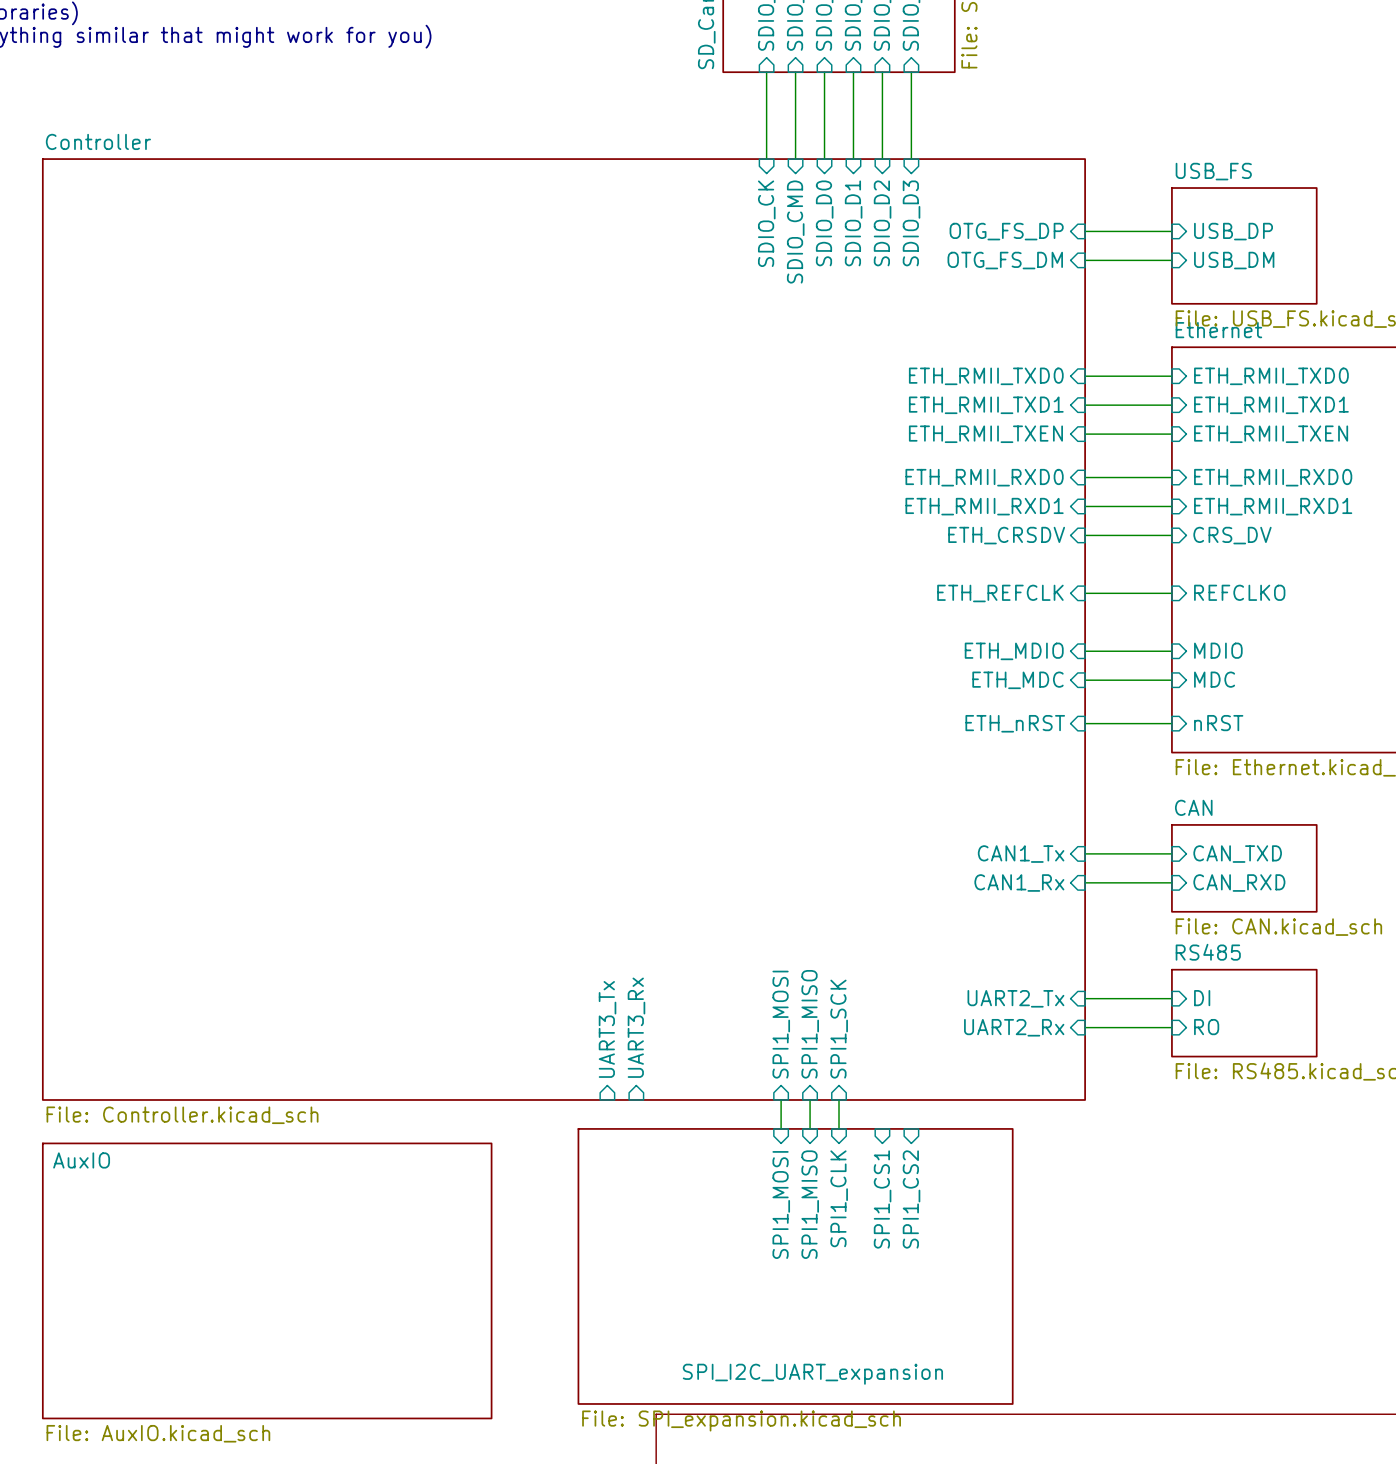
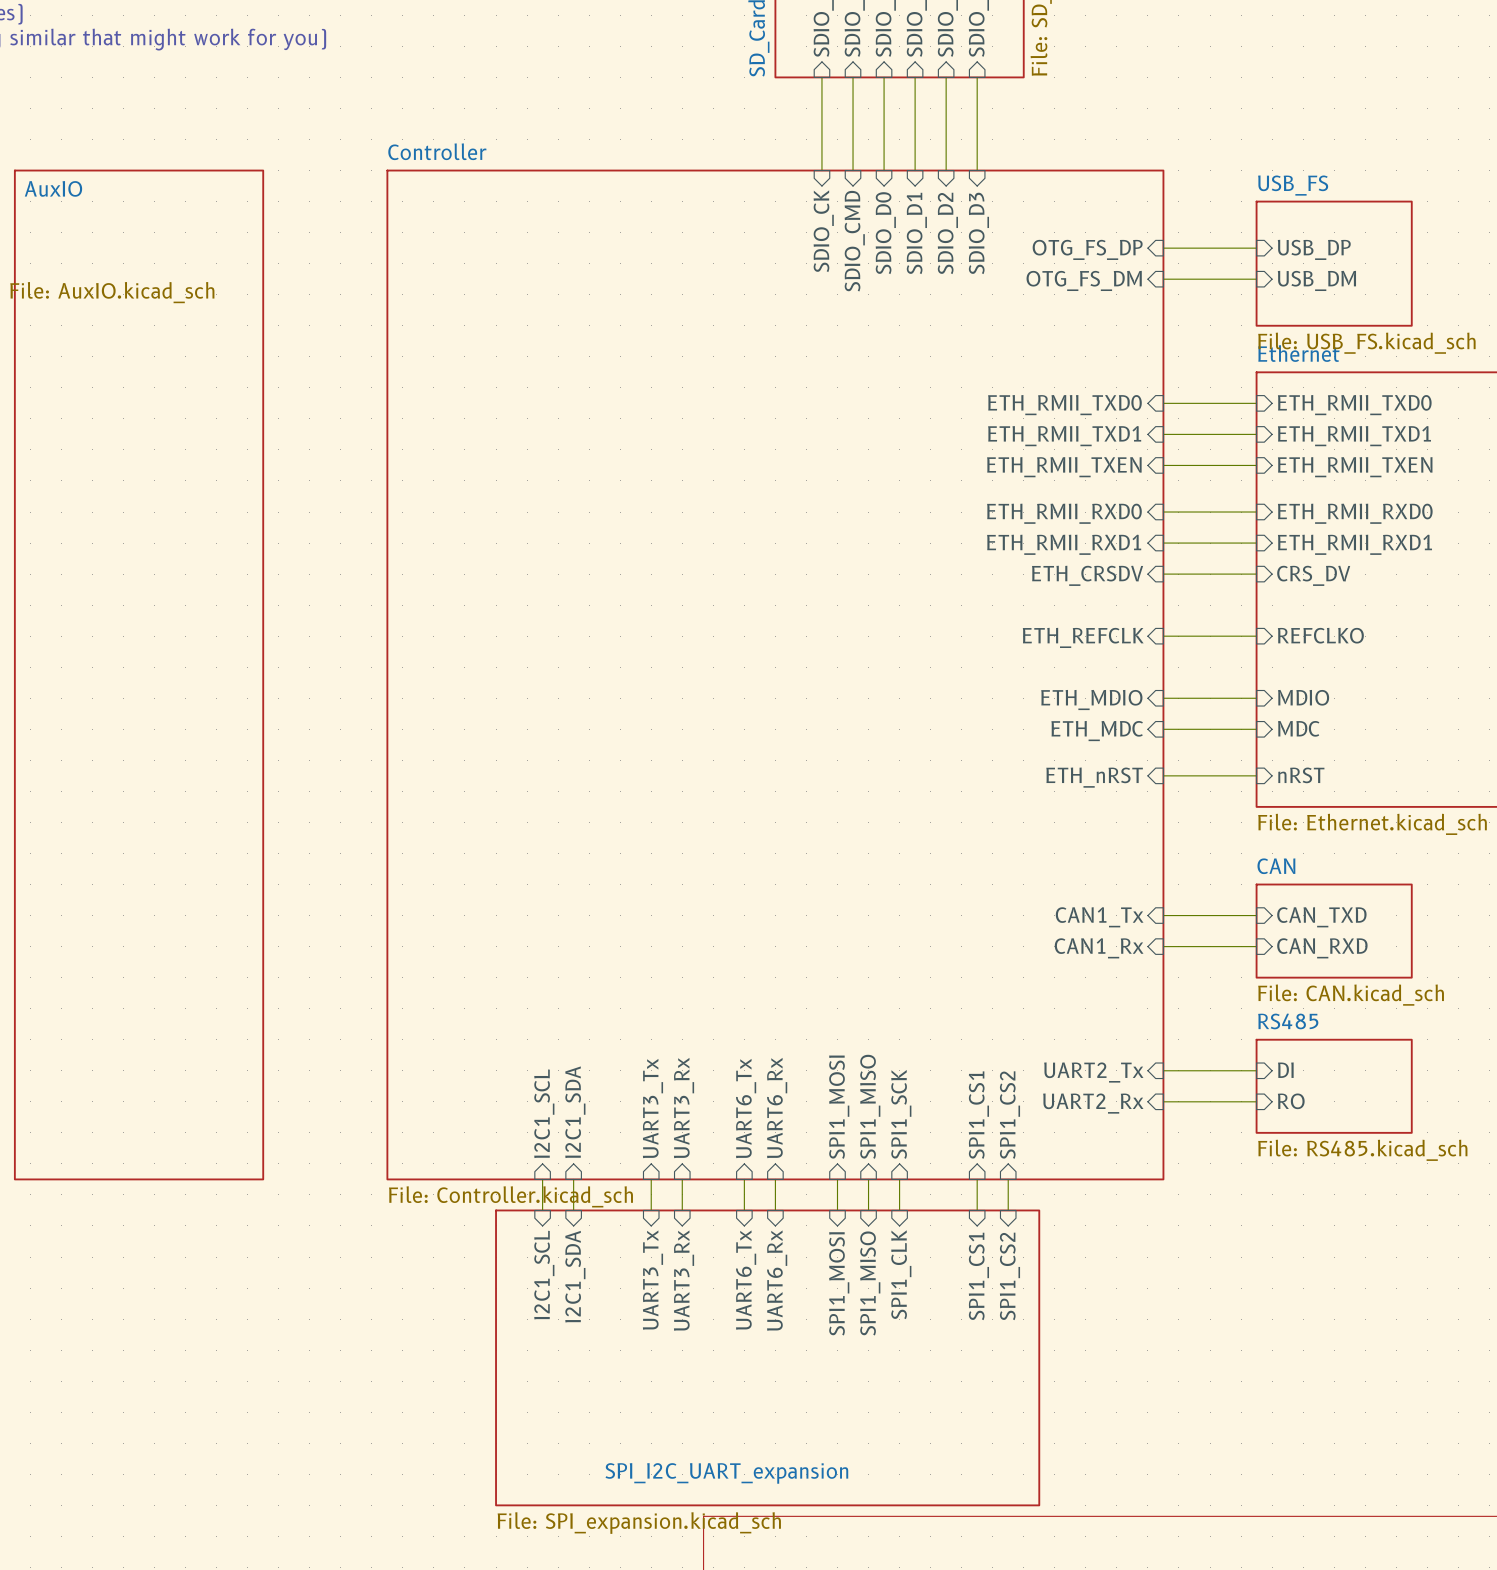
sheet AuxIO: none -> File: AuxIO.kicad_sch (139, 674)
sheet Controller: File: Controller.kicad_sch (563, 629) -> none
sheet Controller: none -> File: Controller.kicad_sch (775, 674)
sheet pin: none -> UART6_Rx (777, 1108)
sheet pin: none -> I2C1_SCL (544, 1113)
sheet pin: none -> I2C1_SDA (575, 1112)
sheet pin: none -> UART6_Tx (746, 1108)
sheet pin: none -> SPI1_CS2 (1009, 1115)
wire: none -> (542, 1179) (542, 1210)
wire: none -> (573, 1179) (573, 1210)
wire: none -> (651, 1179) (651, 1210)
wire: none -> (682, 1179) (682, 1210)
wire: none -> (744, 1179) (744, 1210)
wire: none -> (775, 1179) (775, 1210)
wire: none -> (977, 1179) (977, 1210)
wire: none -> (1008, 1179) (1008, 1210)
sheet SPI_I2C_UART_expansion shape: [577, 1128, 1014, 1405] -> [495, 1209, 1041, 1507]
sheet pin: none -> I2C1_SCL (544, 1275)
sheet pin: none -> I2C1_SDA (575, 1276)
sheet pin: none -> UART3_Tx (652, 1280)
sheet pin: none -> UART6_Tx (746, 1280)
sheet pin: none -> UART3_Rx (684, 1280)
sheet pin: none -> UART6_Rx (777, 1280)
sheet pin rotation: 0° (882, 1199) -> 180° (978, 1115)
sheet pin position: SPI1_CS1 (882, 1199) -> SPI1_CS1 (978, 1115)
sheet pin: SPI1_CS2 (911, 1199) -> SPI1_CS1 (978, 1276)
sheet pin: none -> SPI1_CS2 (1009, 1276)
sheet AuxIO: File: AuxIO.kicad_sch (267, 1280) -> none
sheet SPI_I2C_UART_expansion name position: SPI_I2C_UART_expansion (812, 1374) -> SPI_I2C_UART_expansion (726, 1473)
sheet SPI_I2C_UART_expansion value position: File: SPI_expansion.kicad_sch (741, 1420) -> File: SPI_expansion.kicad_sch (639, 1523)

